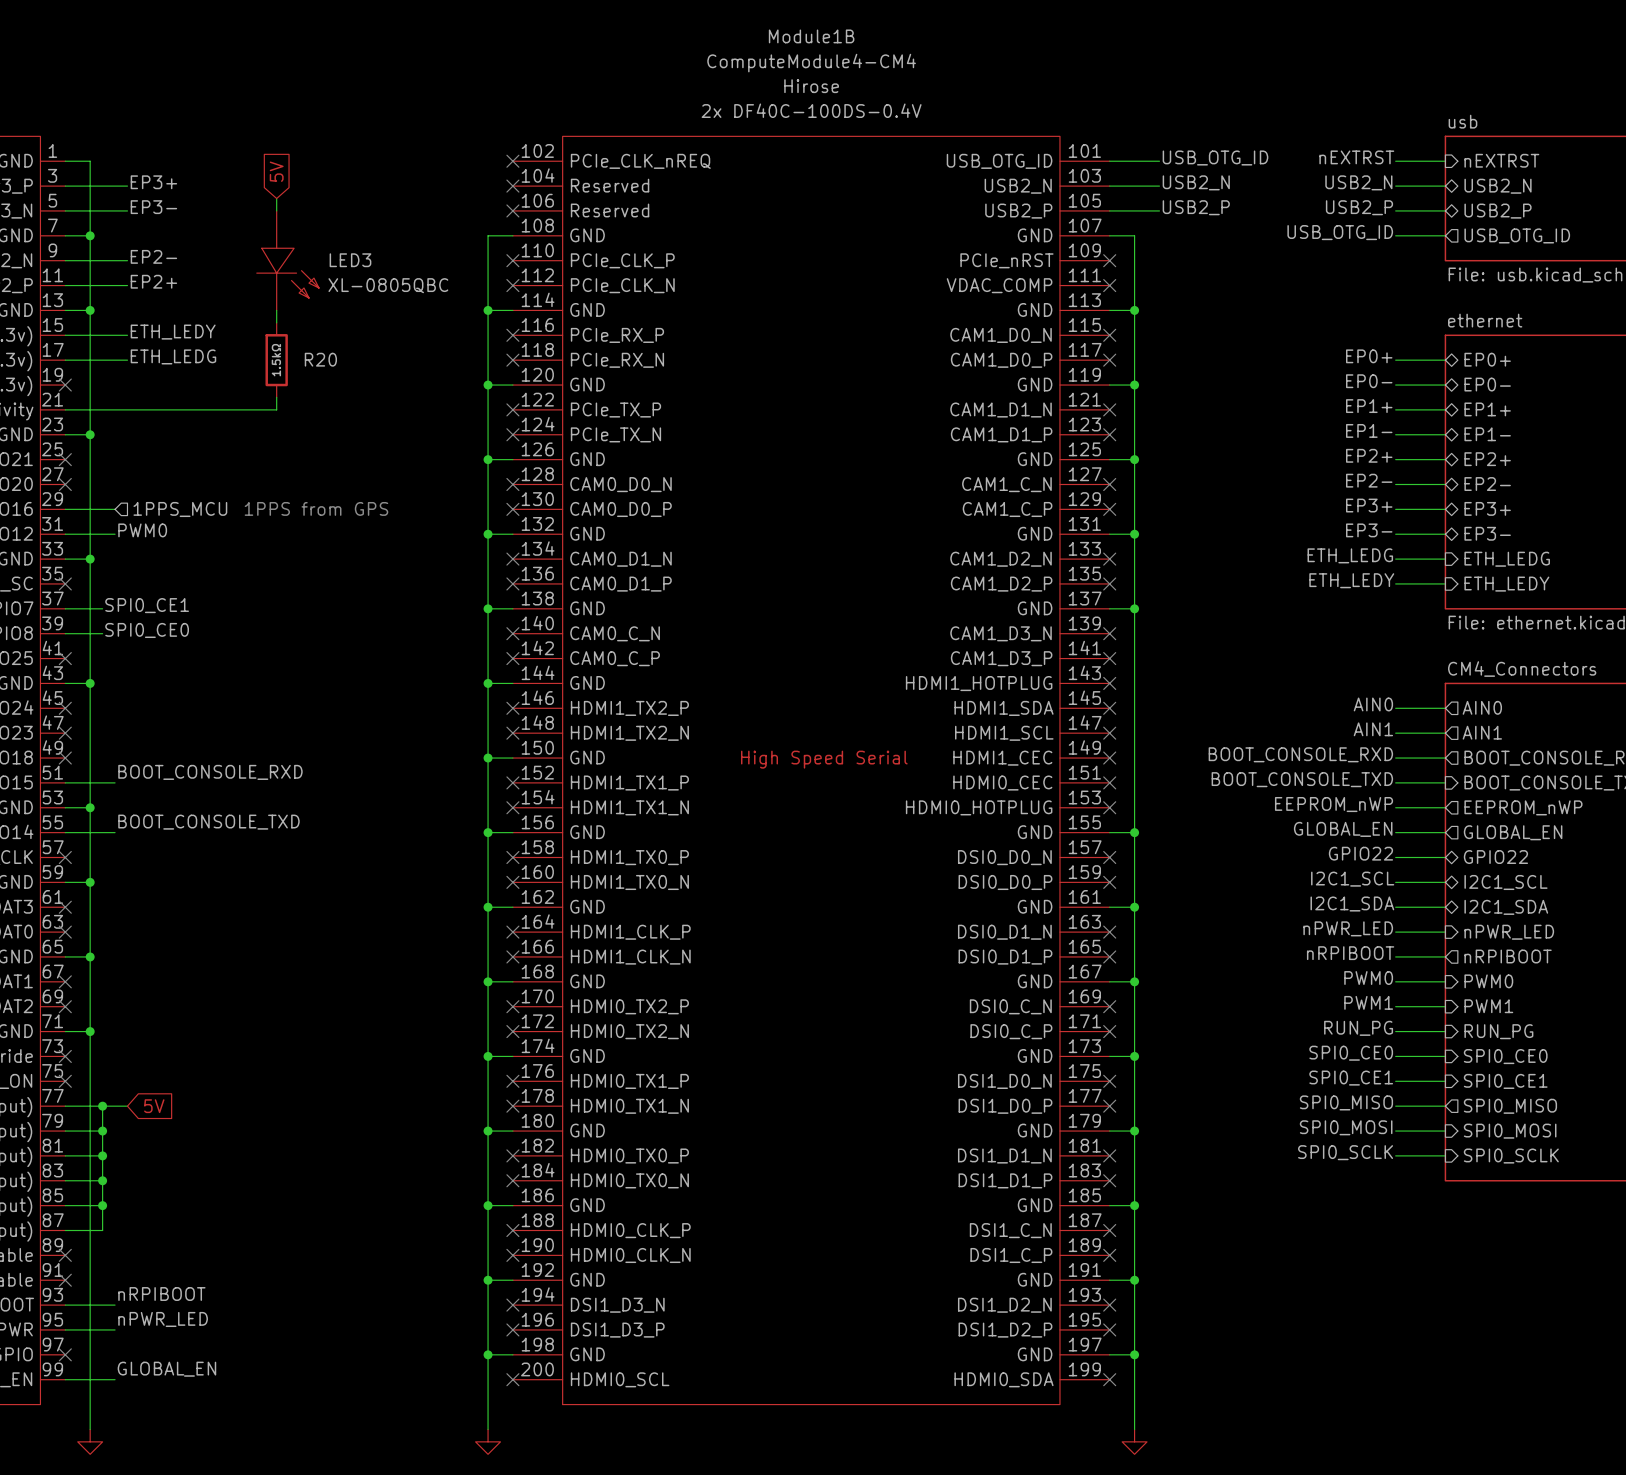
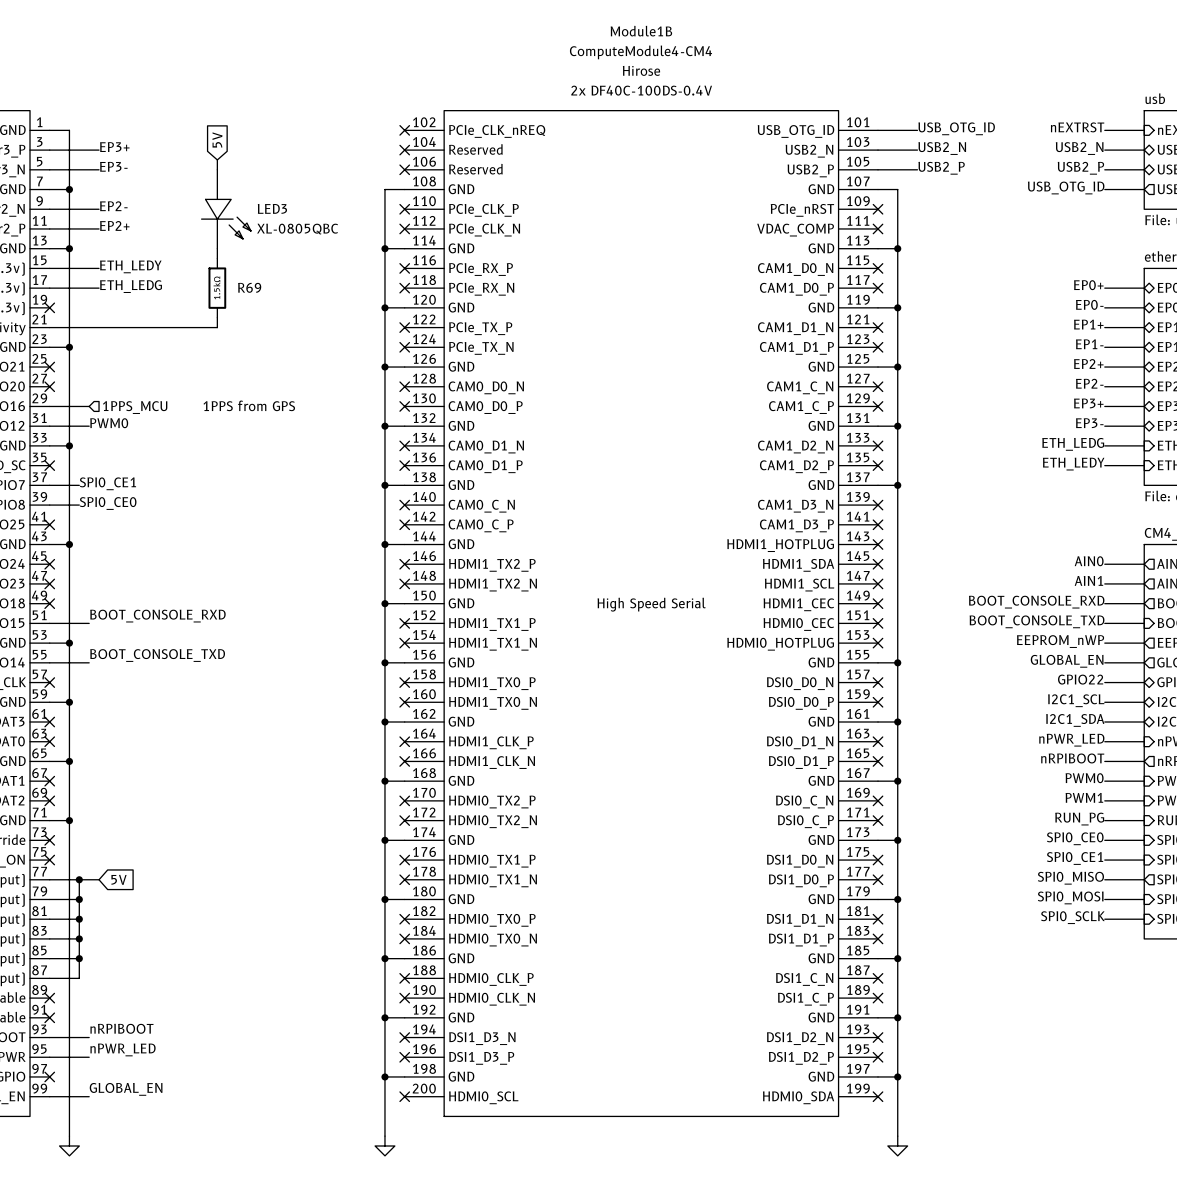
R20 name: R20 (320, 359) -> R69 (249, 287)

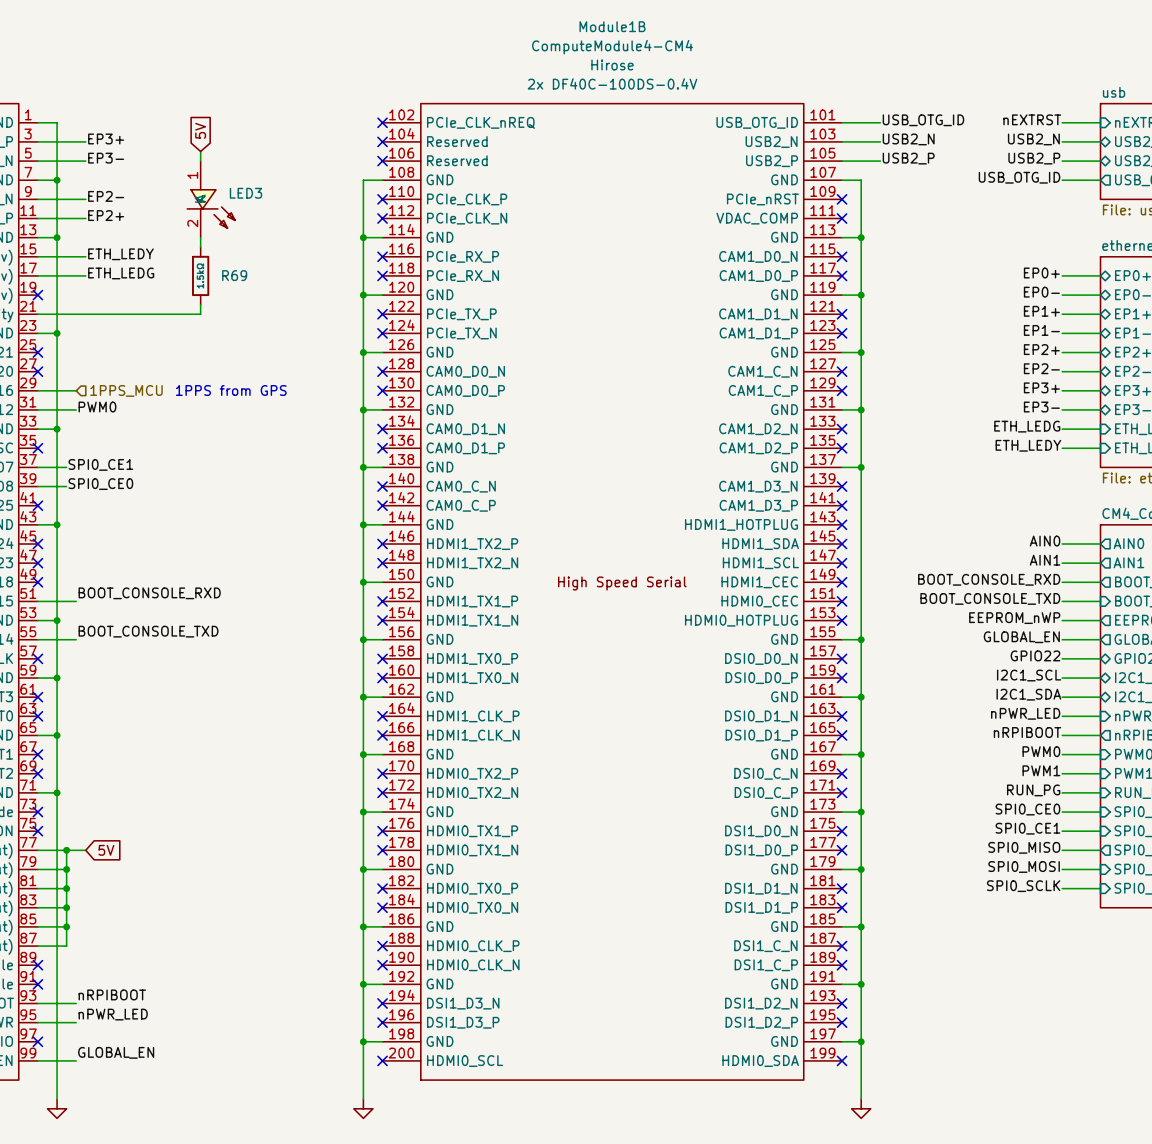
LED3 symbol: [201, 169, 251, 249] -> [187, 161, 236, 238]
LED3 value: XL-0805QBC (297, 229) -> none

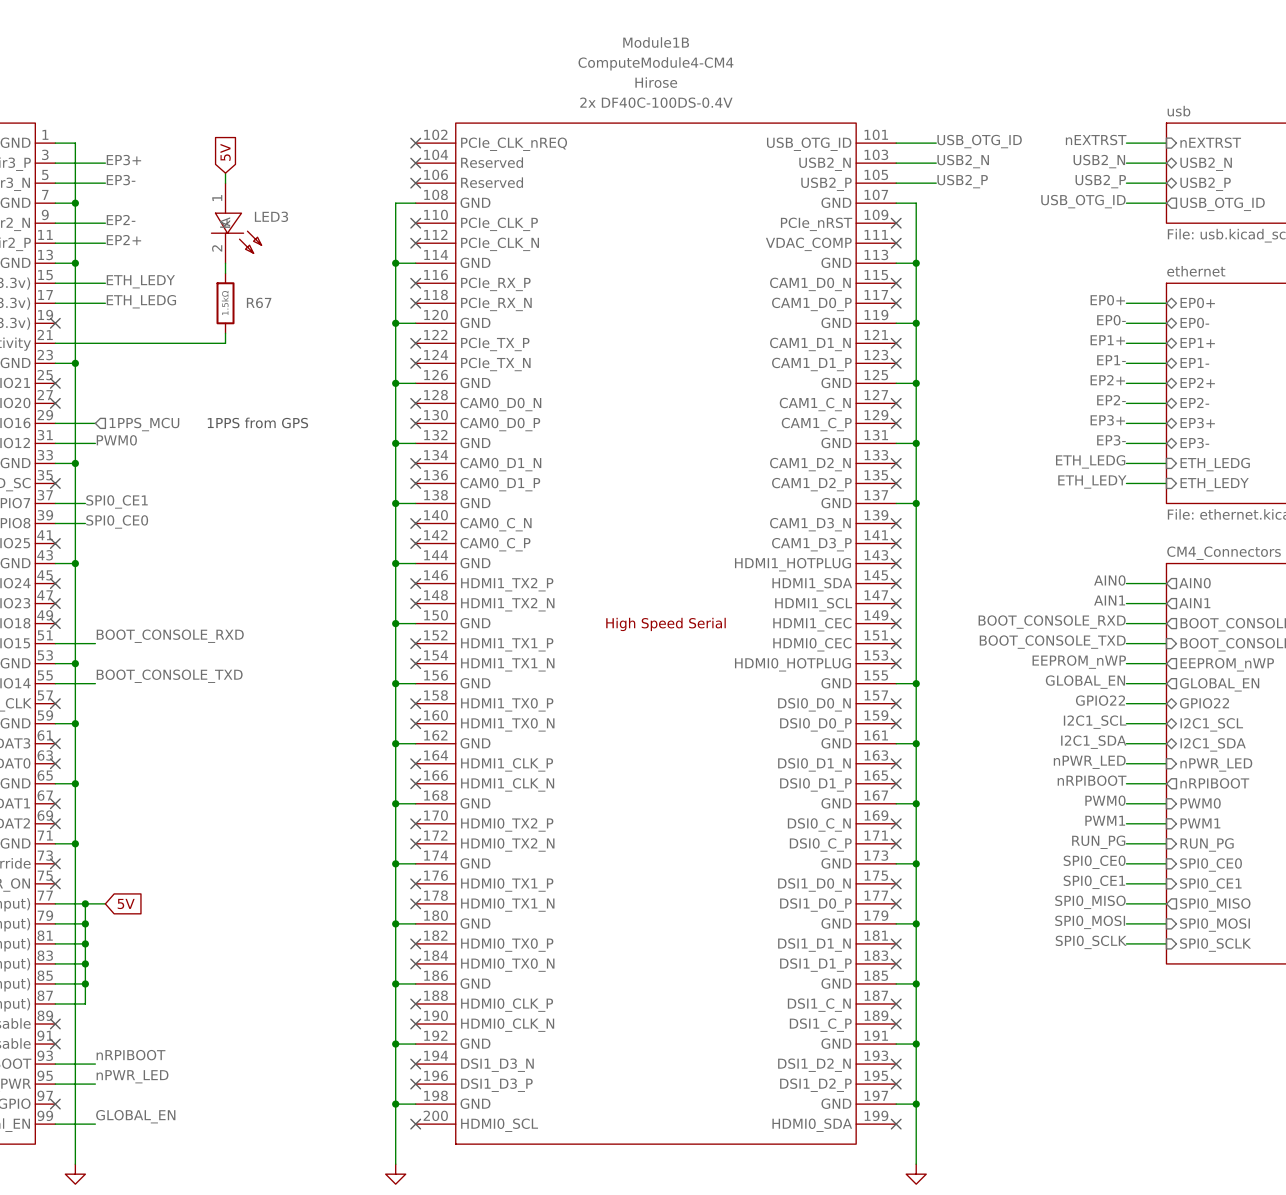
R69 name: R69 (234, 275) -> R67 (259, 302)

